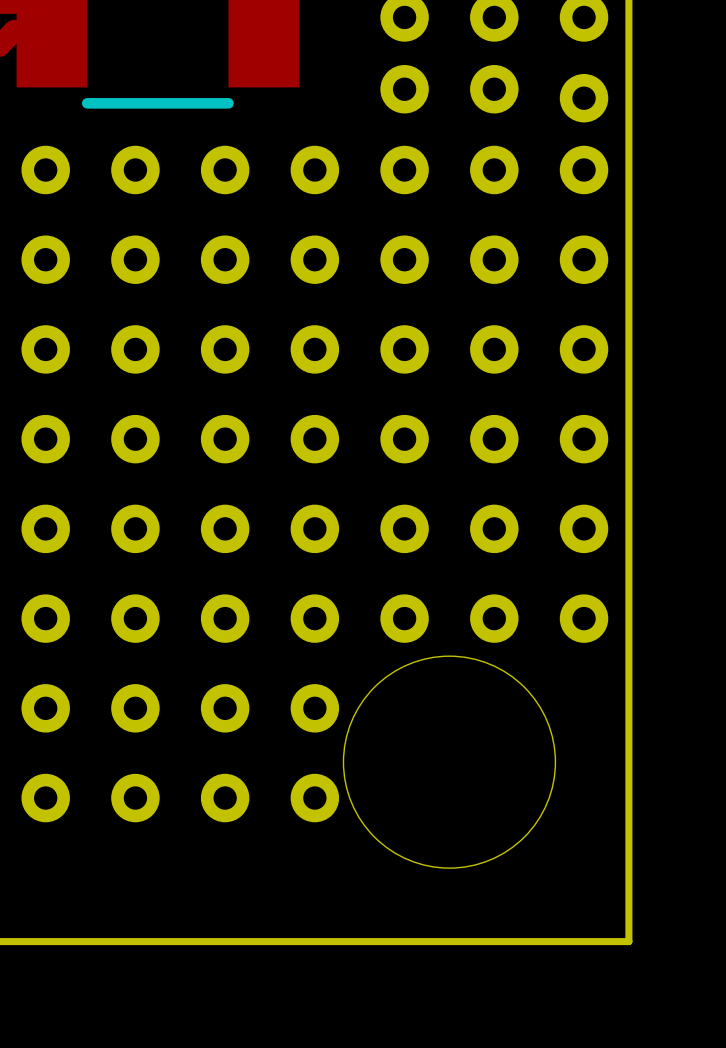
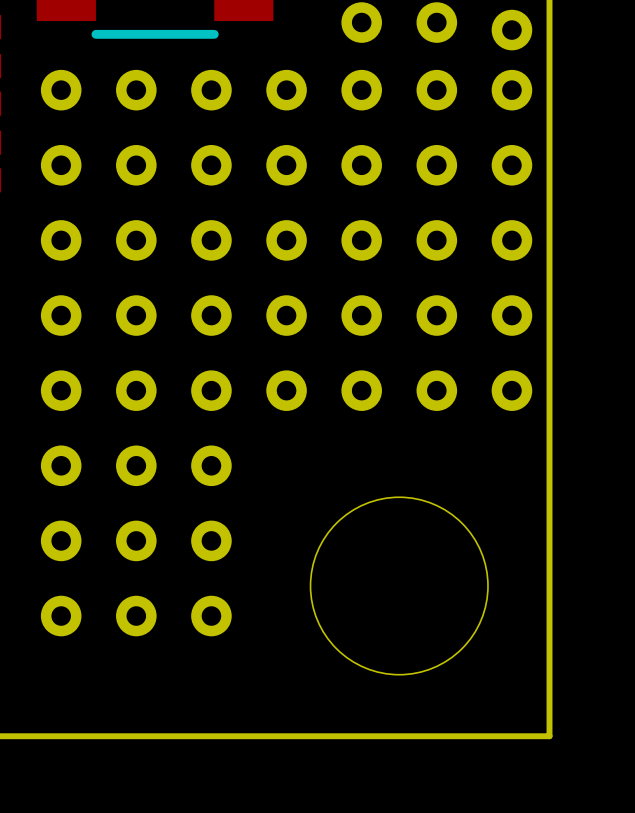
part: (314, 618) -> none
part: (404, 618) -> none
part: (494, 618) -> none
part: (584, 618) -> none
part: (314, 708) -> none
part: (314, 798) -> none

